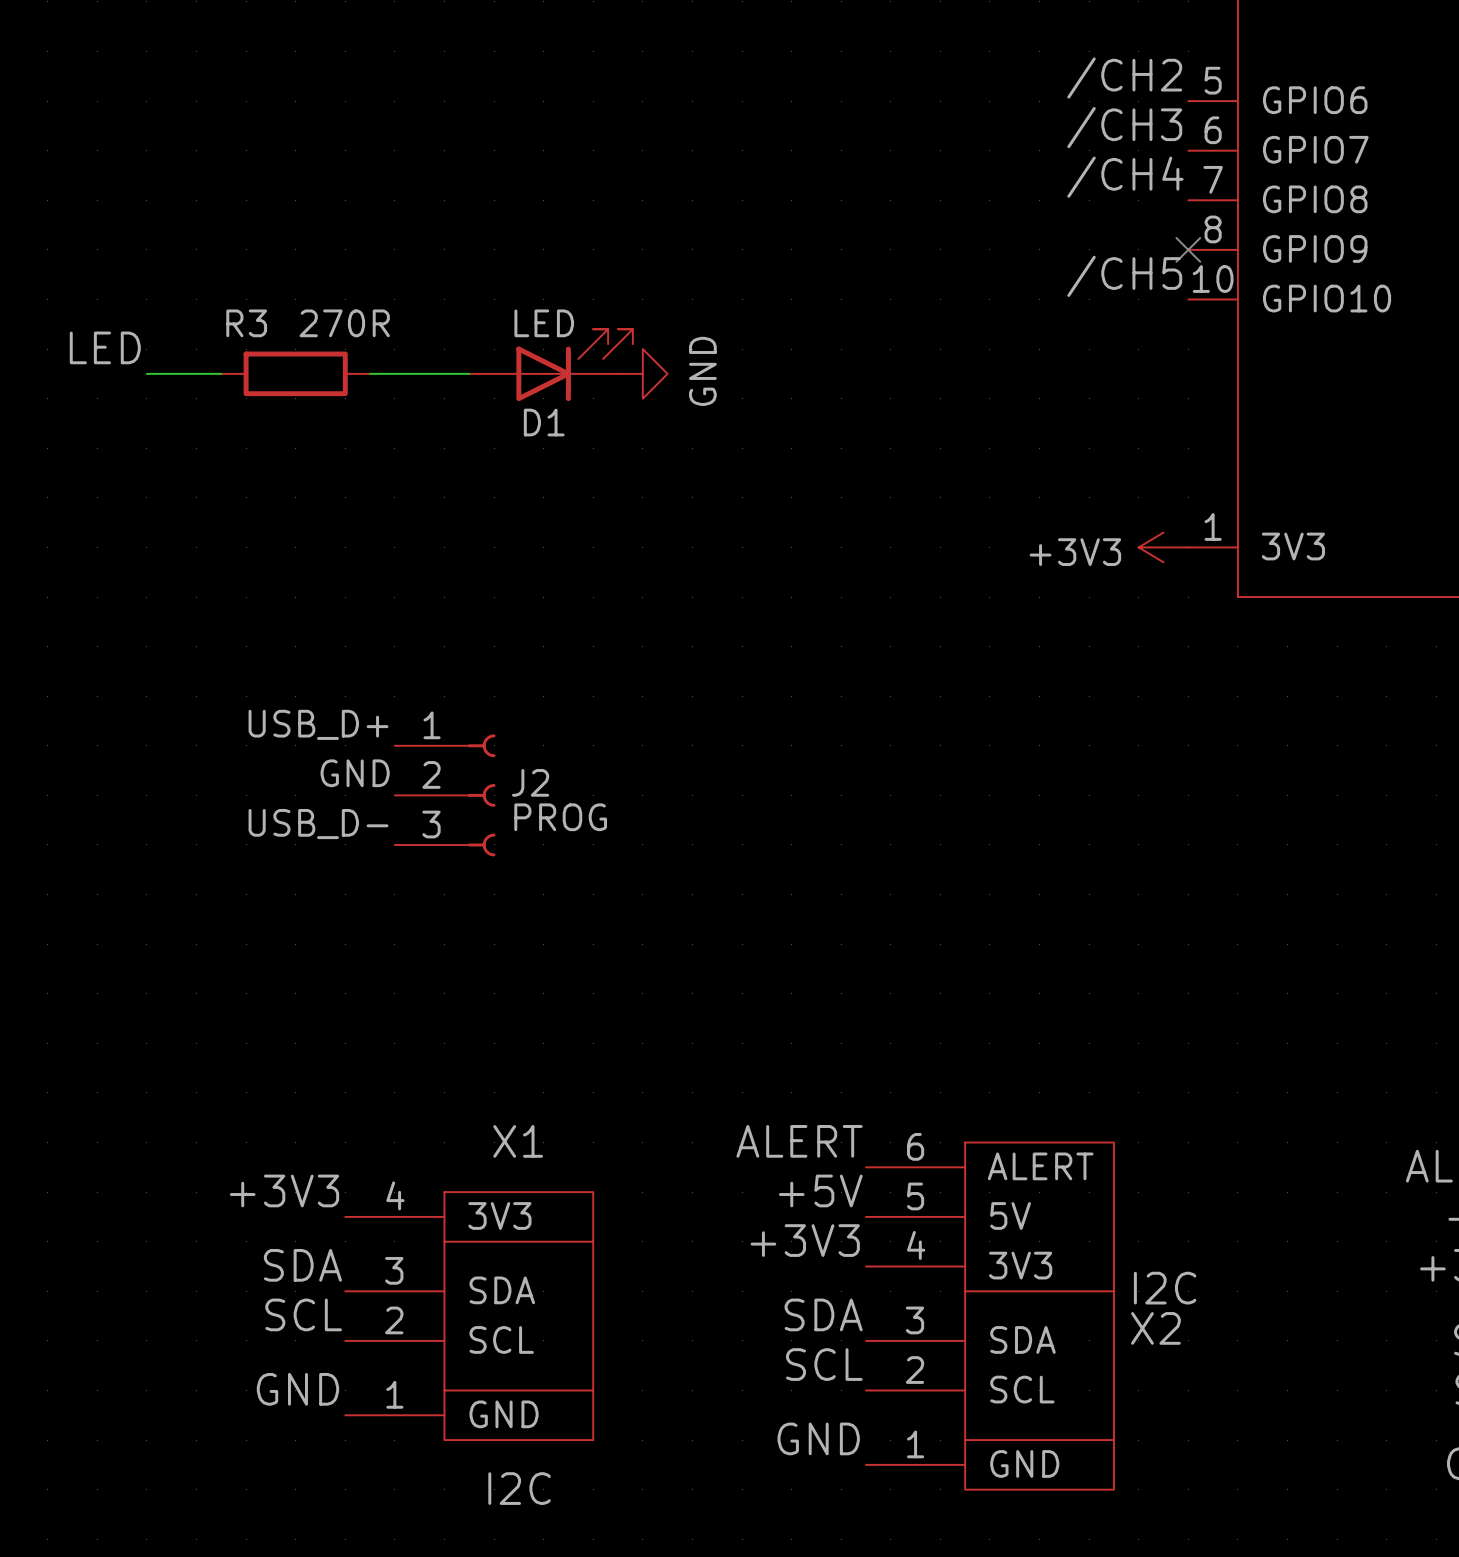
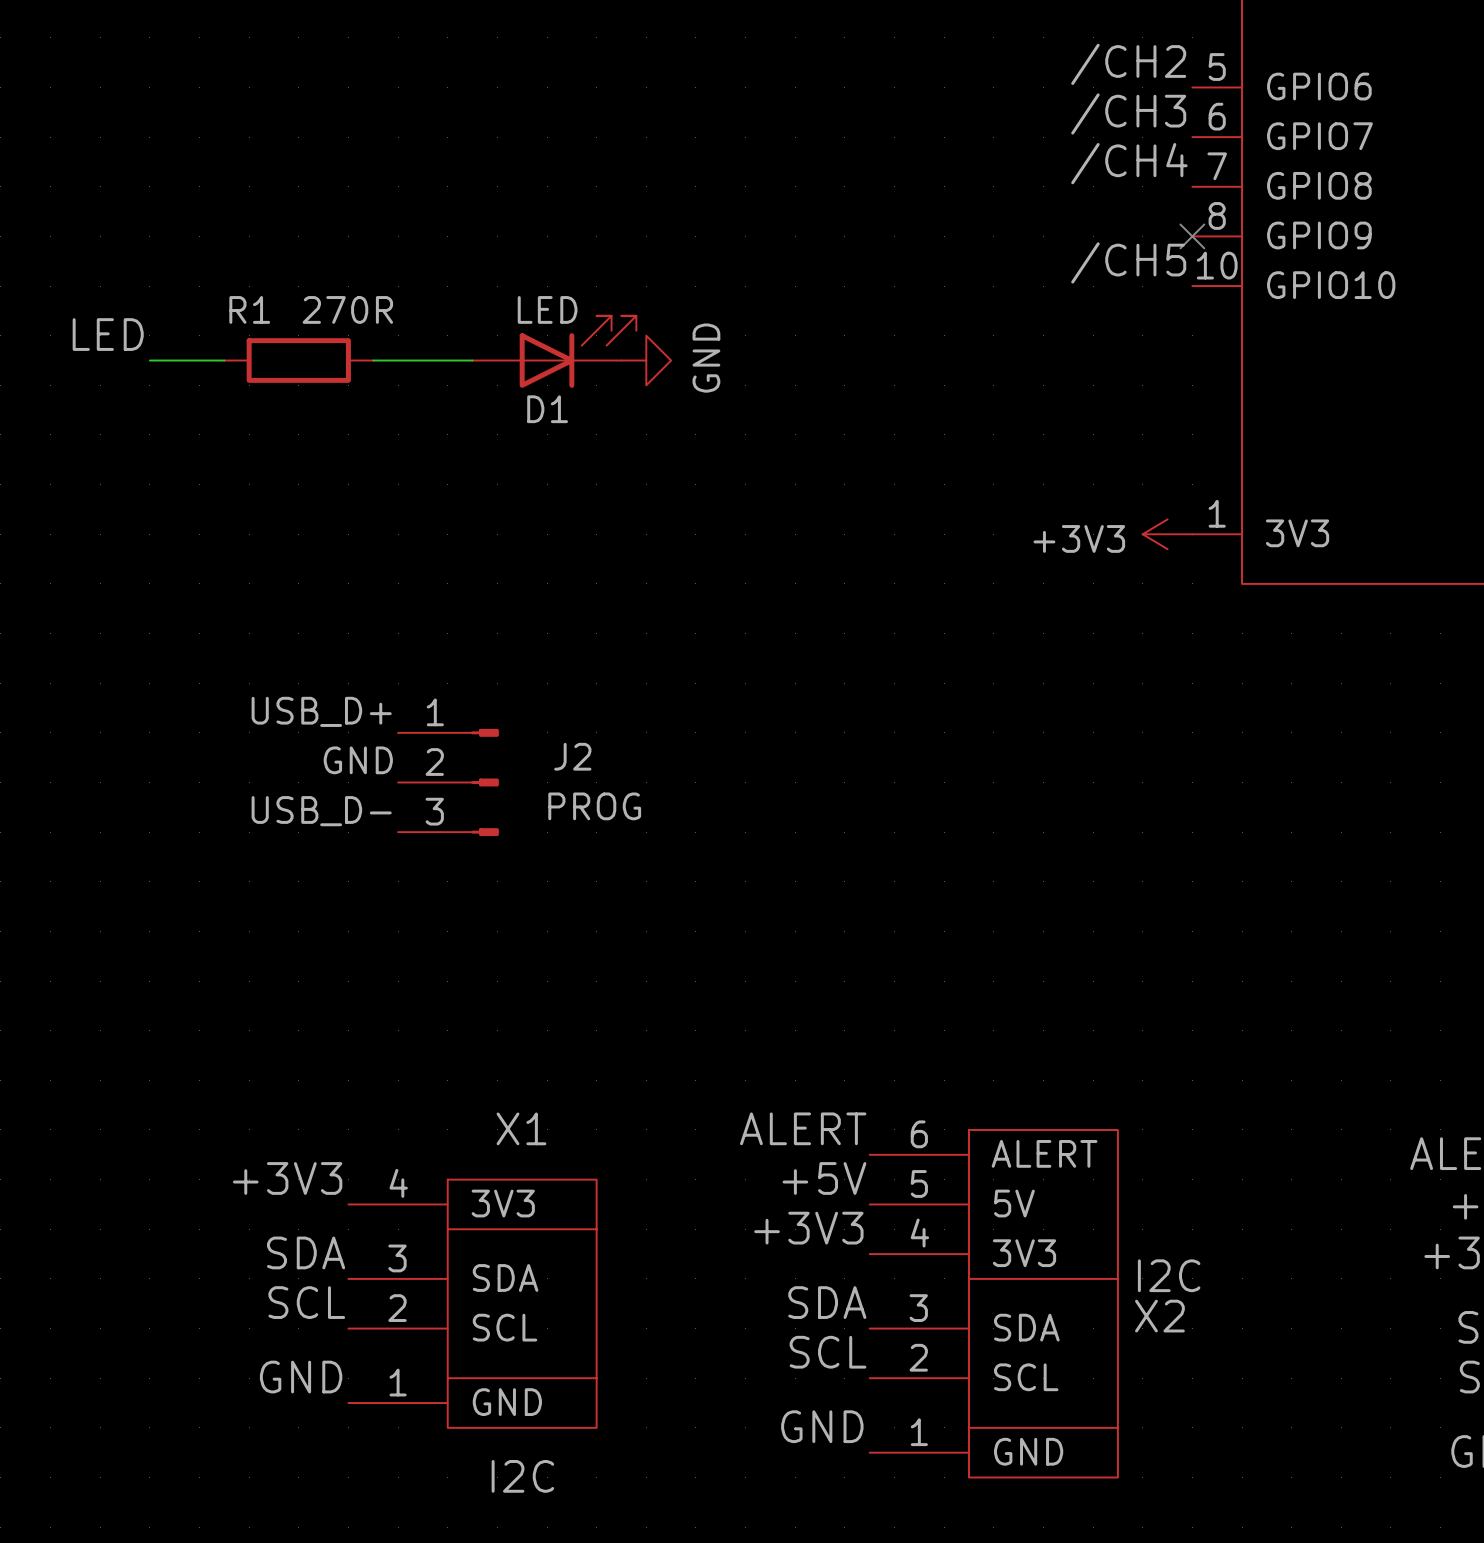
R3 name: R3 (246, 323) -> R1 (249, 309)
J2 symbol: [394, 734, 496, 857] -> [398, 728, 499, 837]
J2 name position: J2 (530, 782) -> J2 (572, 756)
J2 value position: PROG (560, 817) -> PROG (594, 806)

